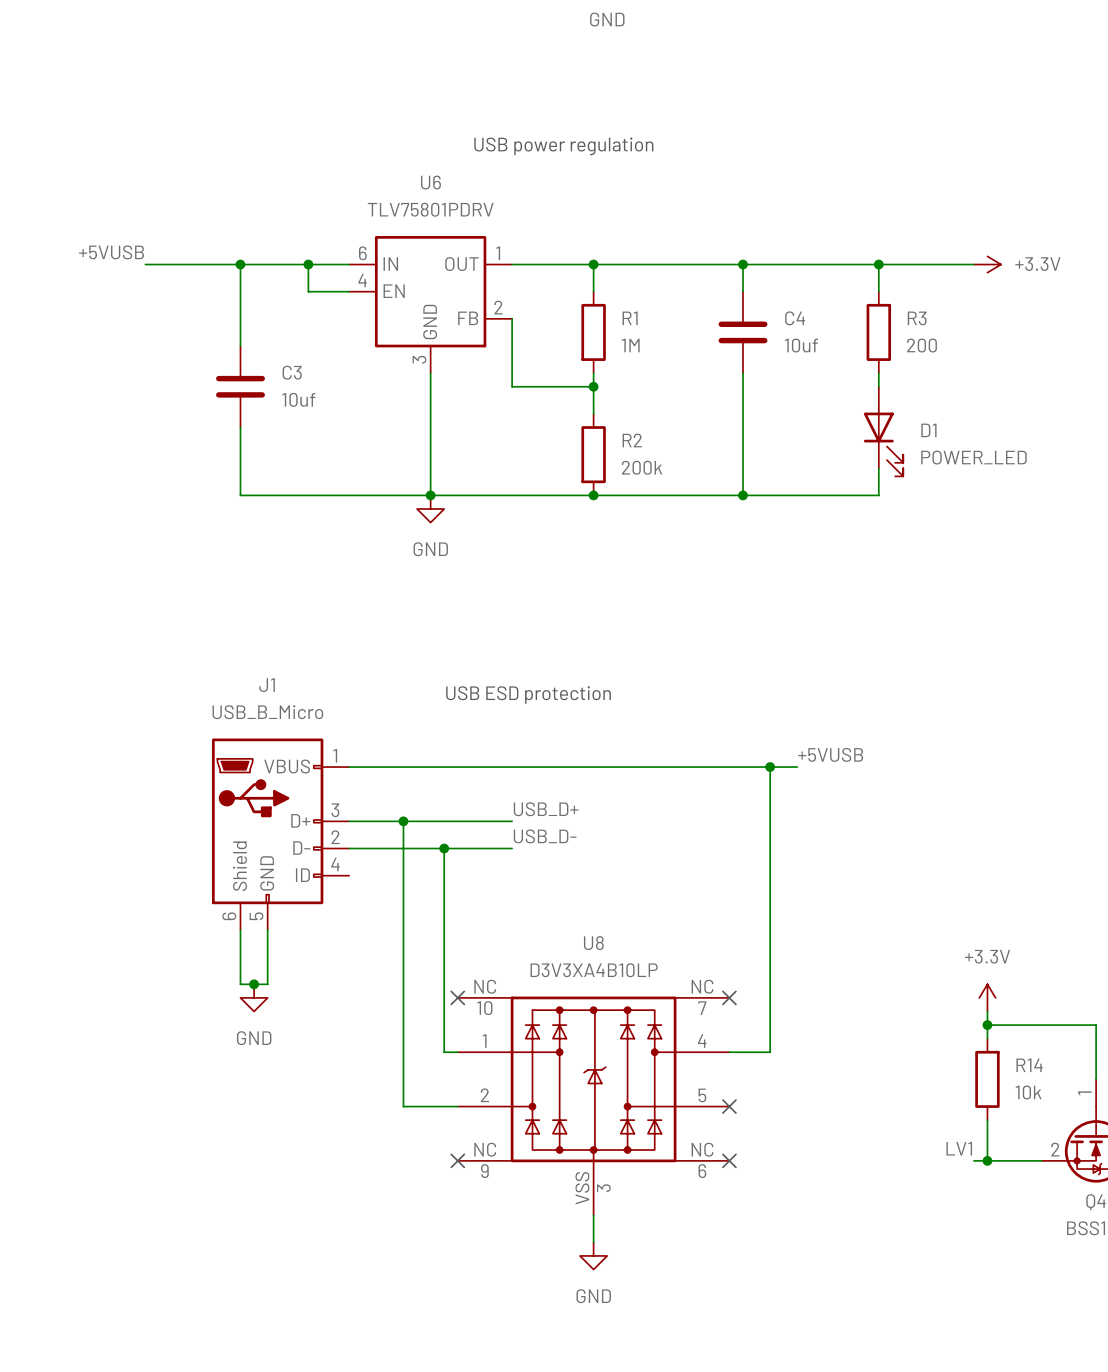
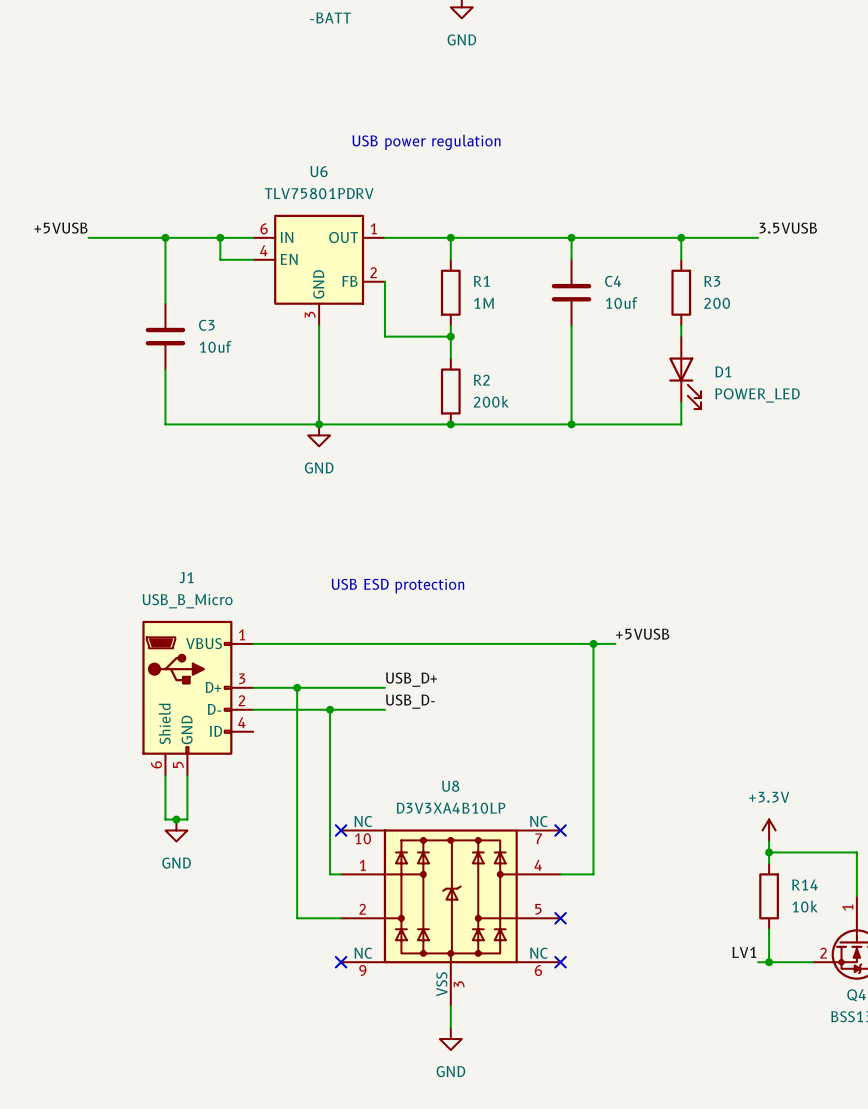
label: none -> 3.5VUSB (788, 228)
power symbol: +3.3V (987, 264) -> none

